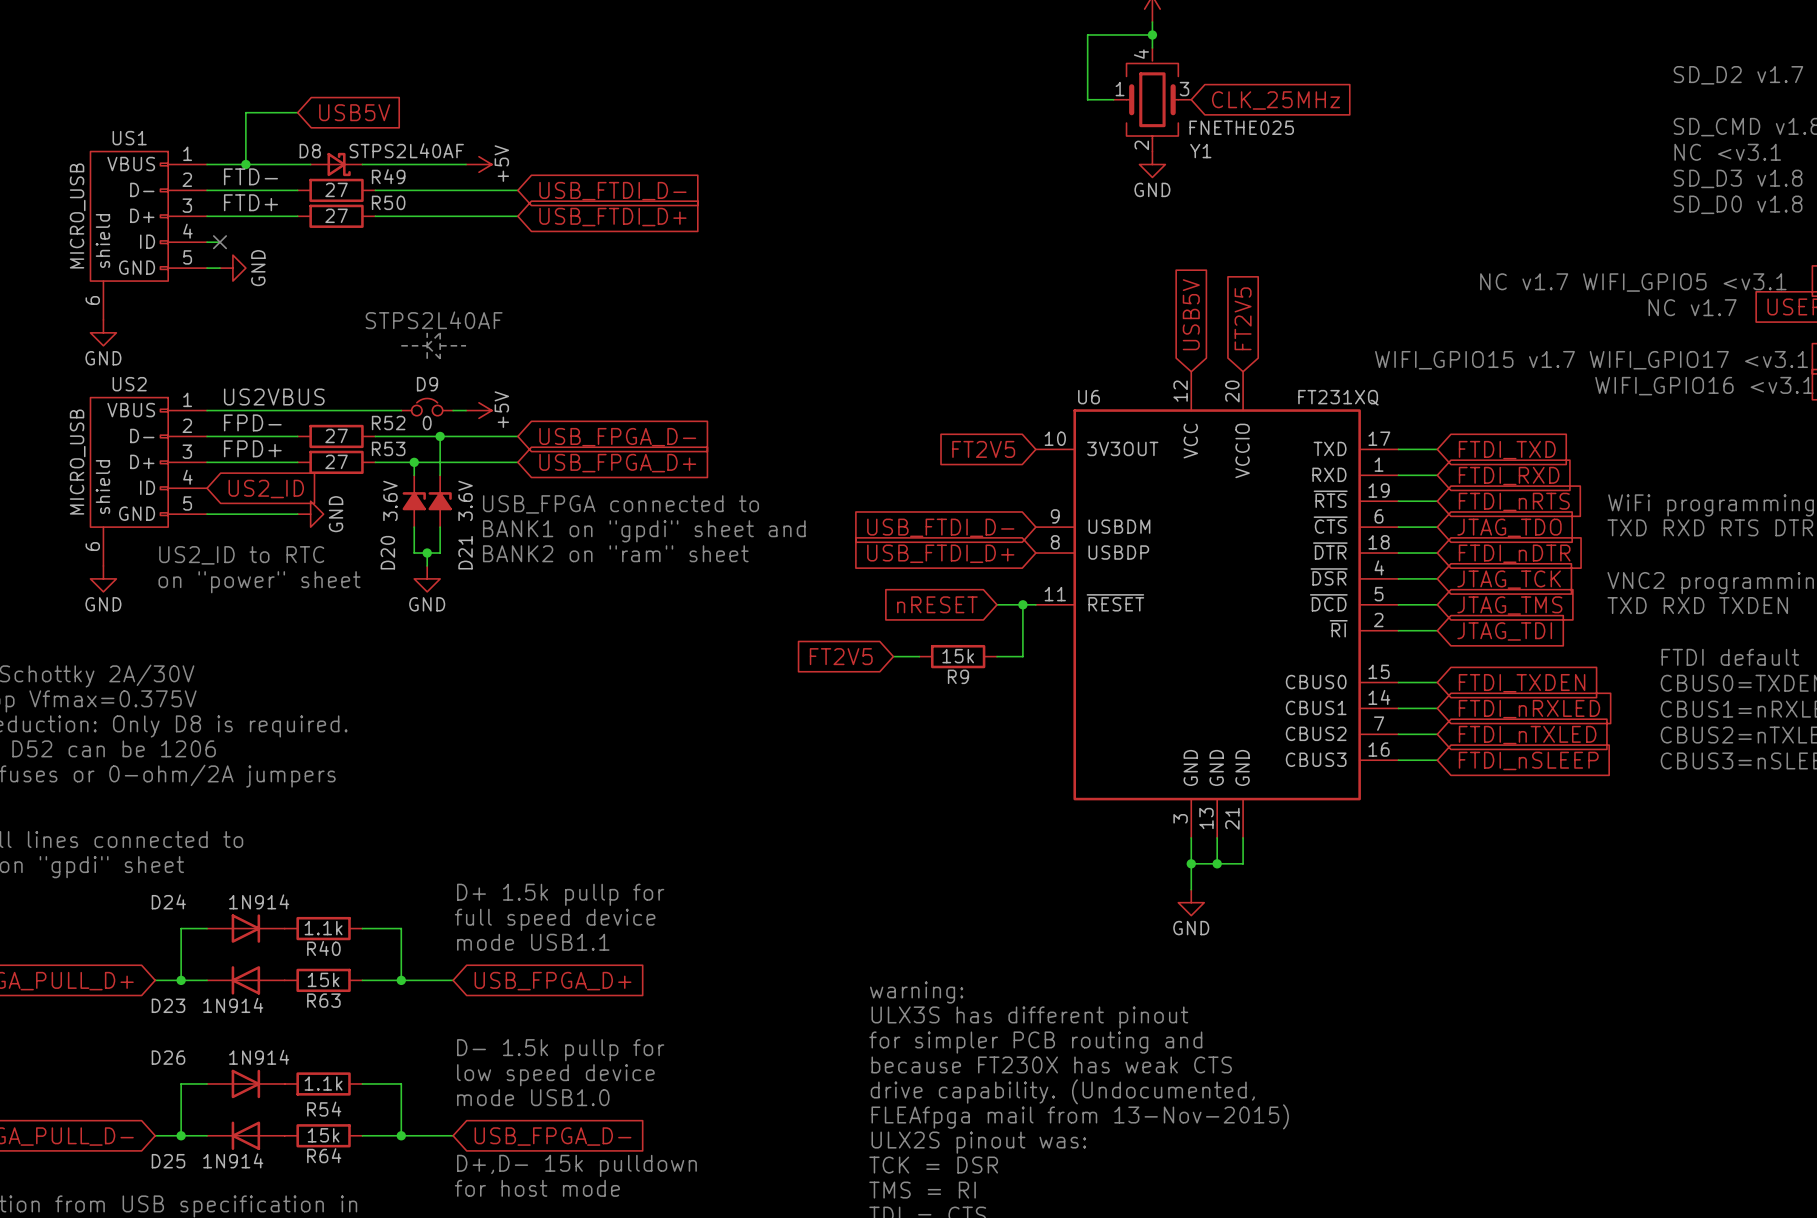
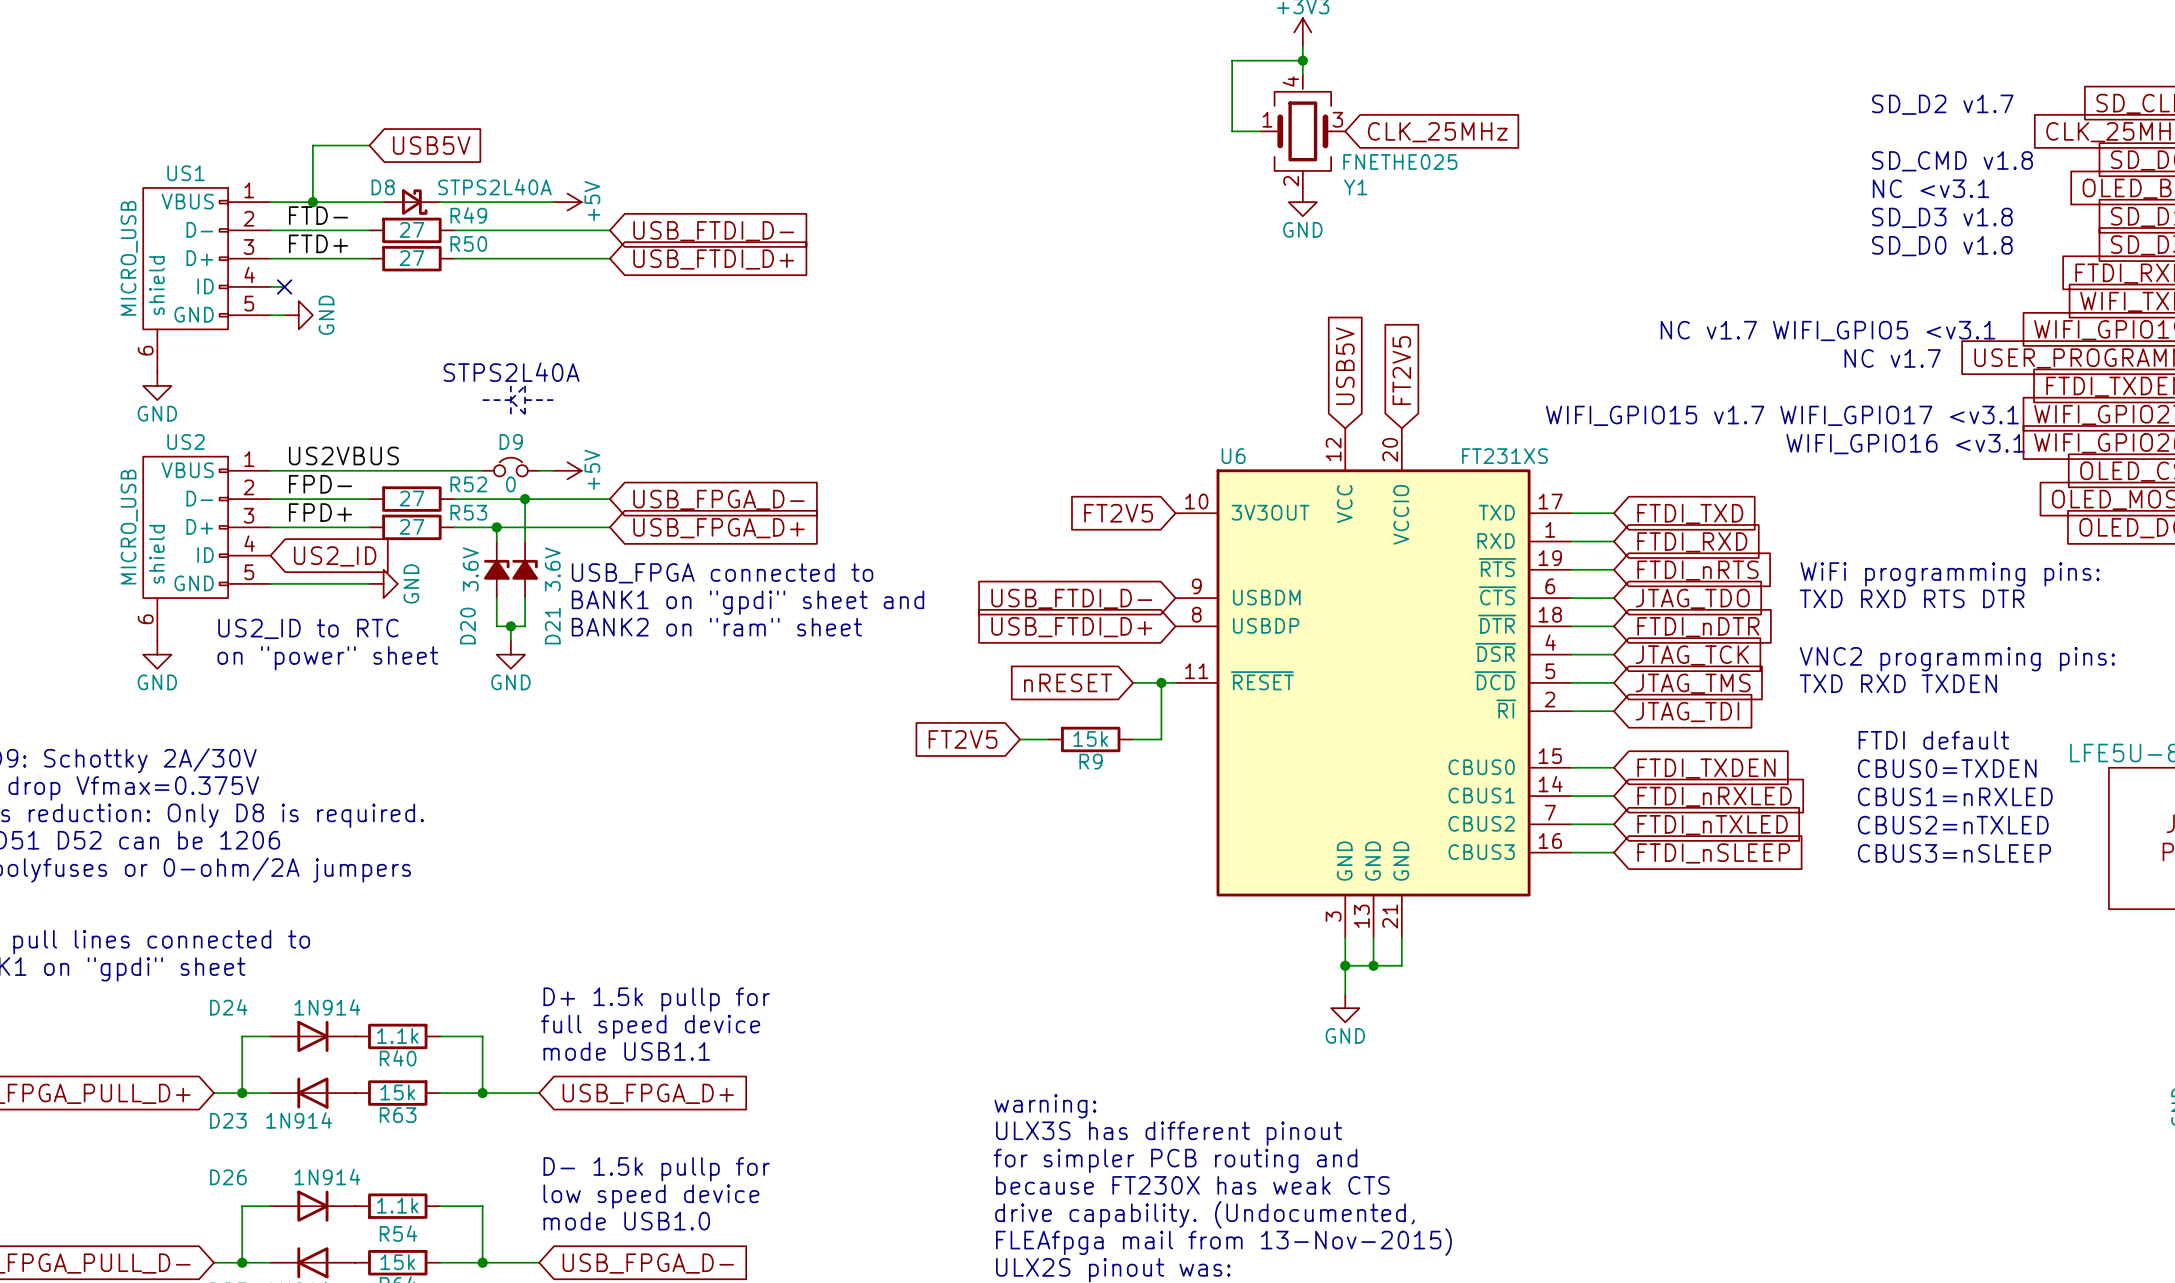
D8 value: STPS2L40AF (406, 150) -> STPS2L40A (494, 187)
text: STPS2L40AF (434, 320) -> STPS2L40A (511, 372)
U6 value: FT231XQ (1338, 397) -> FT231XS (1504, 456)

